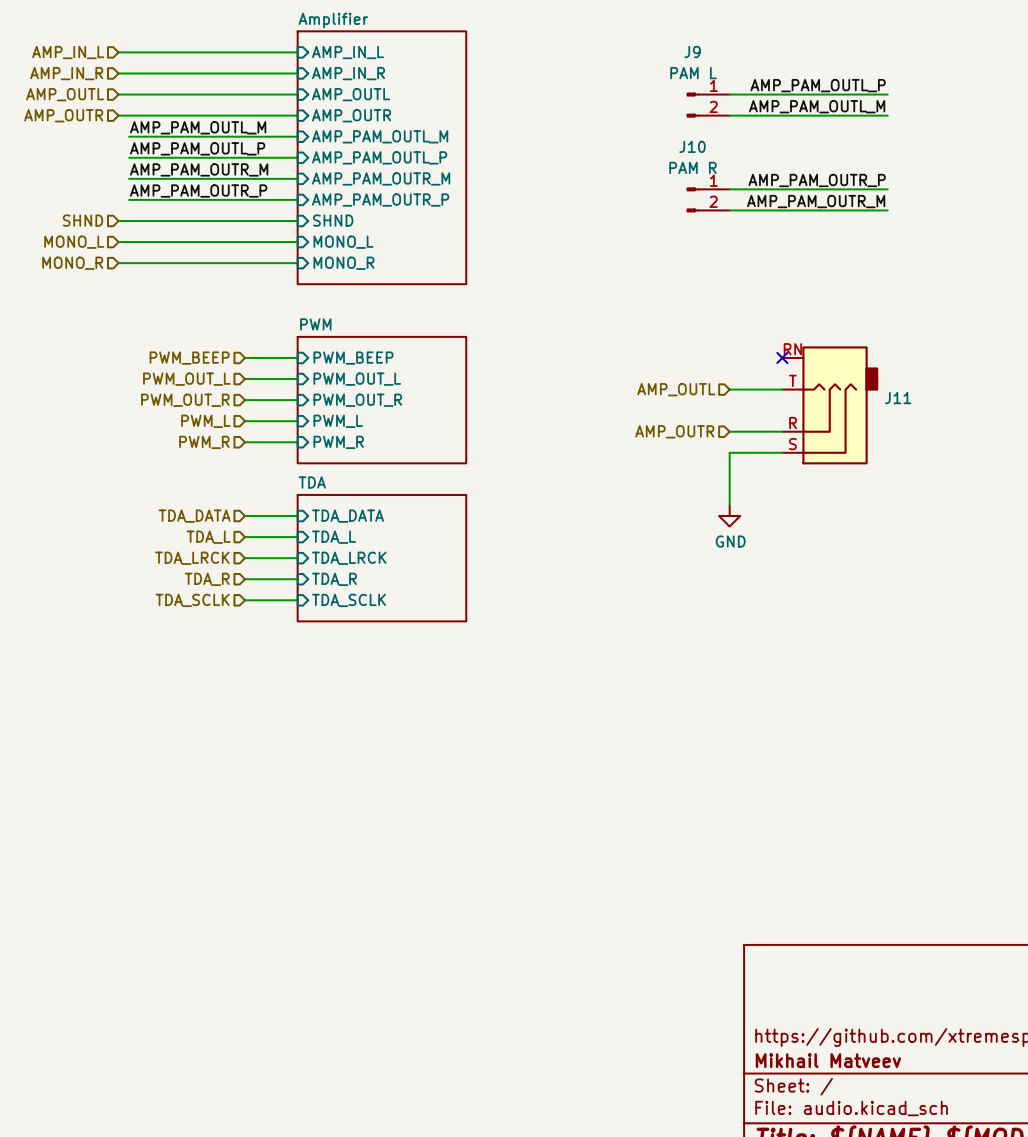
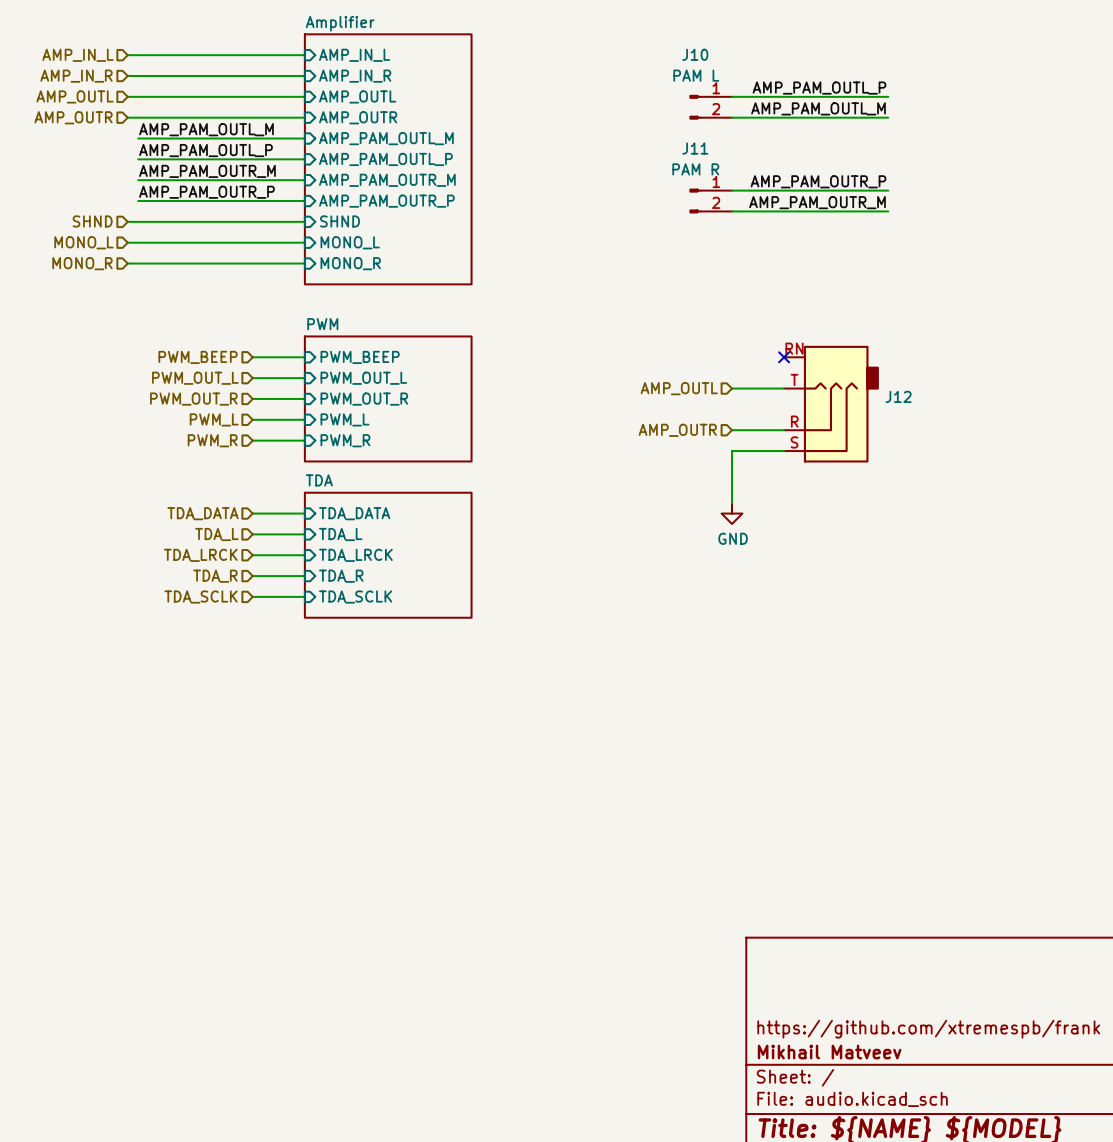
J9 name: J9 (692, 52) -> J10 (695, 54)
J10 name: J10 (692, 146) -> J11 (695, 148)
J11 name: J11 (898, 398) -> J12 (898, 396)

